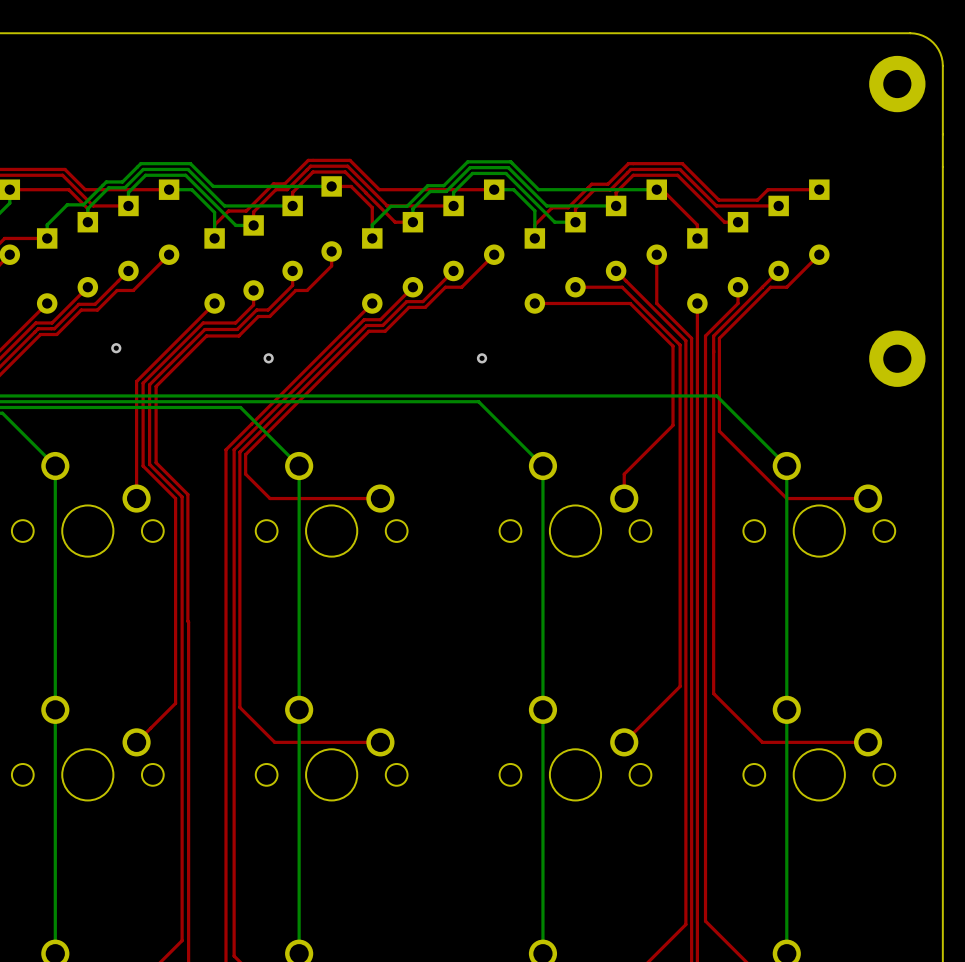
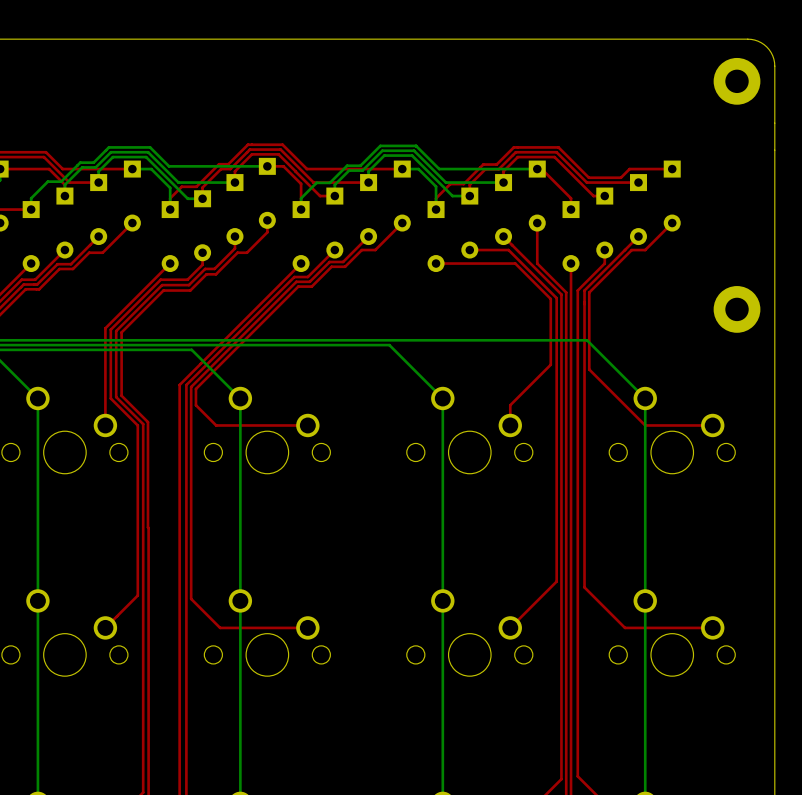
via: (116, 348) -> none
via: (268, 358) -> none
via: (482, 358) -> none

